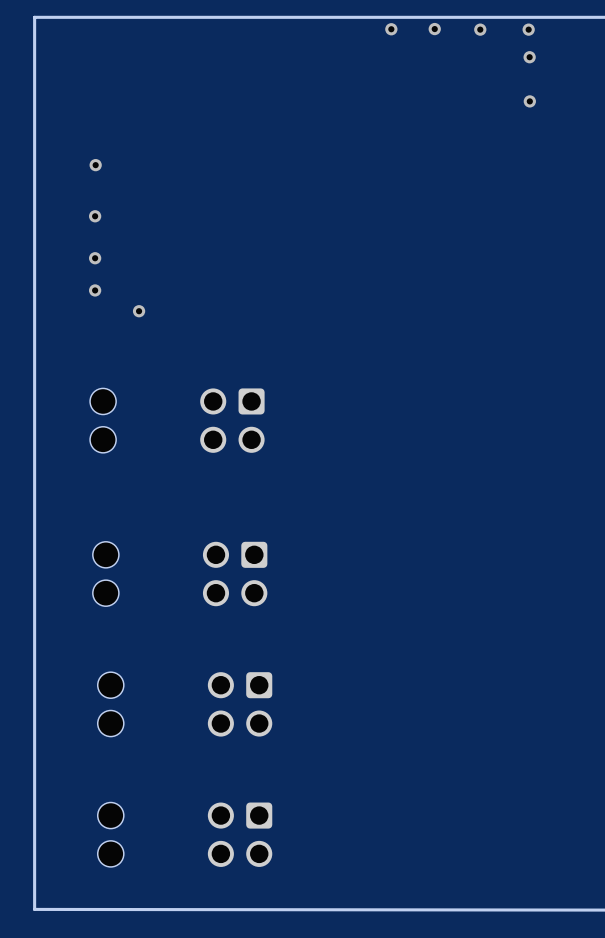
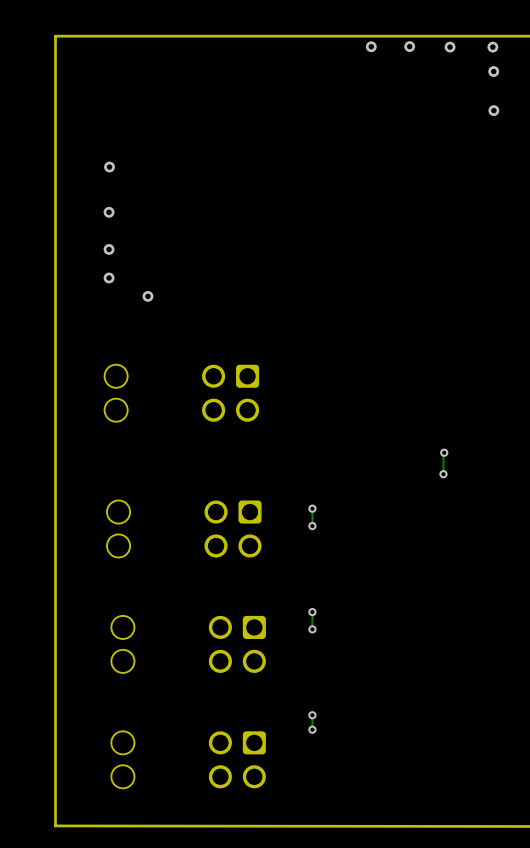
track: none -> (444, 452) (443, 474)
via: none -> (444, 452)
via: none -> (443, 474)
track: none -> (312, 508) (312, 526)
via: none -> (312, 508)
via: none -> (312, 526)
track: none -> (312, 612) (312, 629)
via: none -> (312, 612)
via: none -> (312, 629)
track: none -> (312, 715) (312, 729)
via: none -> (312, 715)
via: none -> (312, 729)

